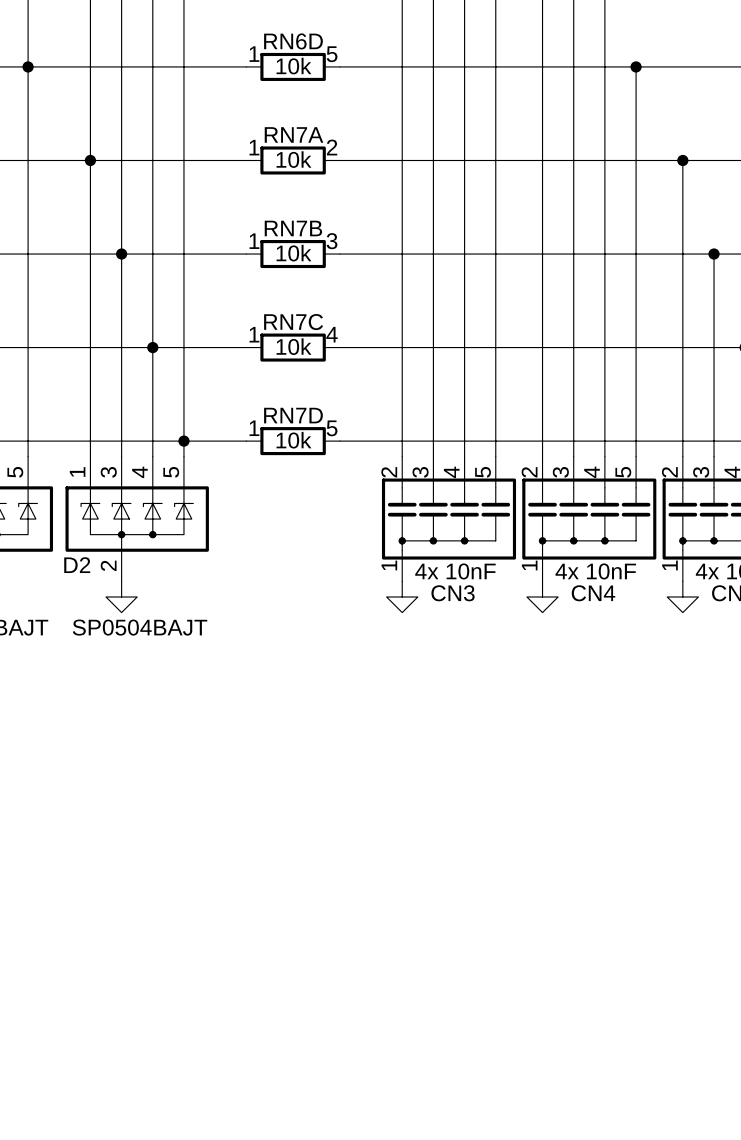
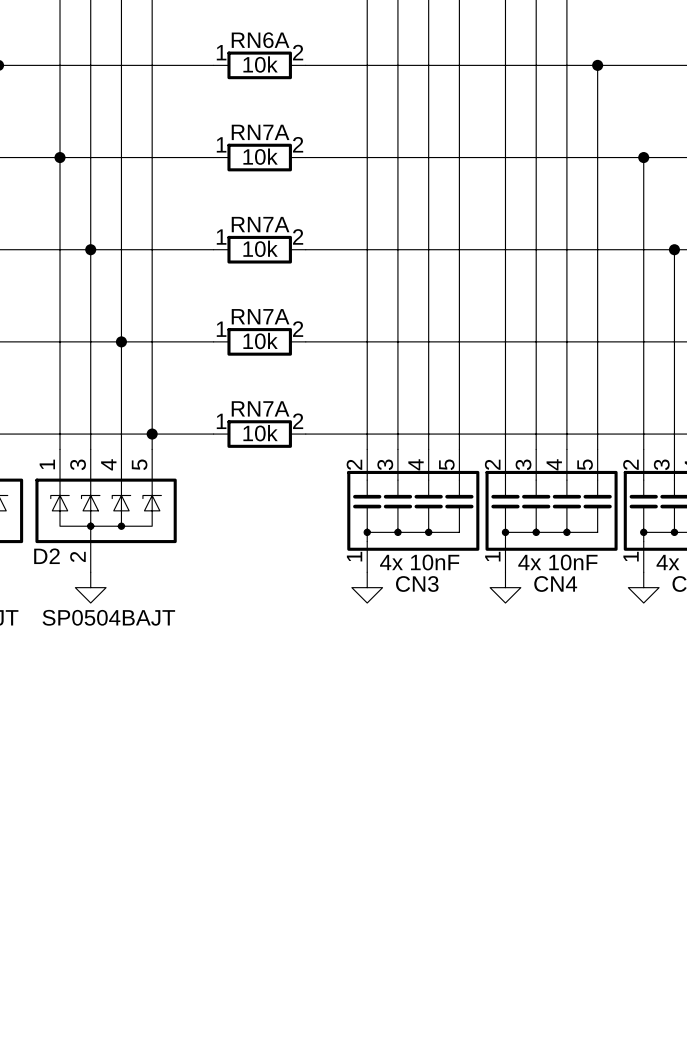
RN6D name: RN6D (293, 41) -> RN6A (260, 40)
RN6D pin number: 5 (332, 54) -> 2 (298, 52)
RN7B name: RN7B (293, 228) -> RN7A (260, 224)
RN7B pin number: 3 (332, 241) -> 2 (298, 236)
RN7C name: RN7C (293, 322) -> RN7A (260, 316)
RN7C pin number: 4 (332, 334) -> 2 (298, 329)
RN7D name: RN7D (293, 415) -> RN7A (260, 408)
RN7D pin number: 5 (332, 428) -> 2 (298, 421)

